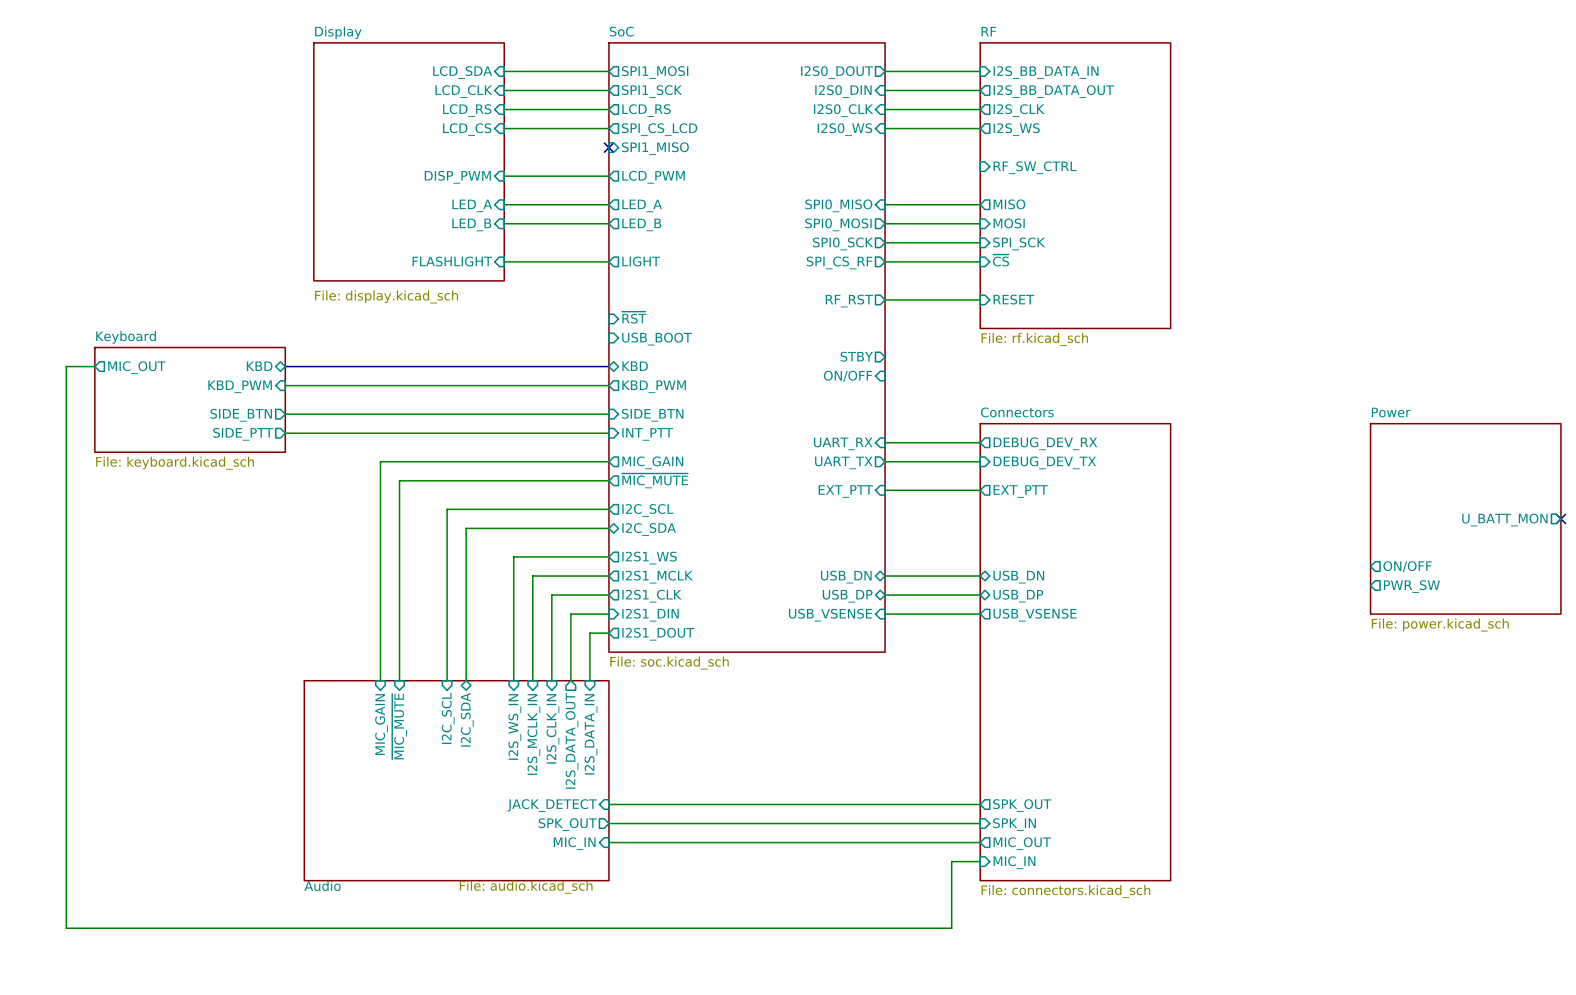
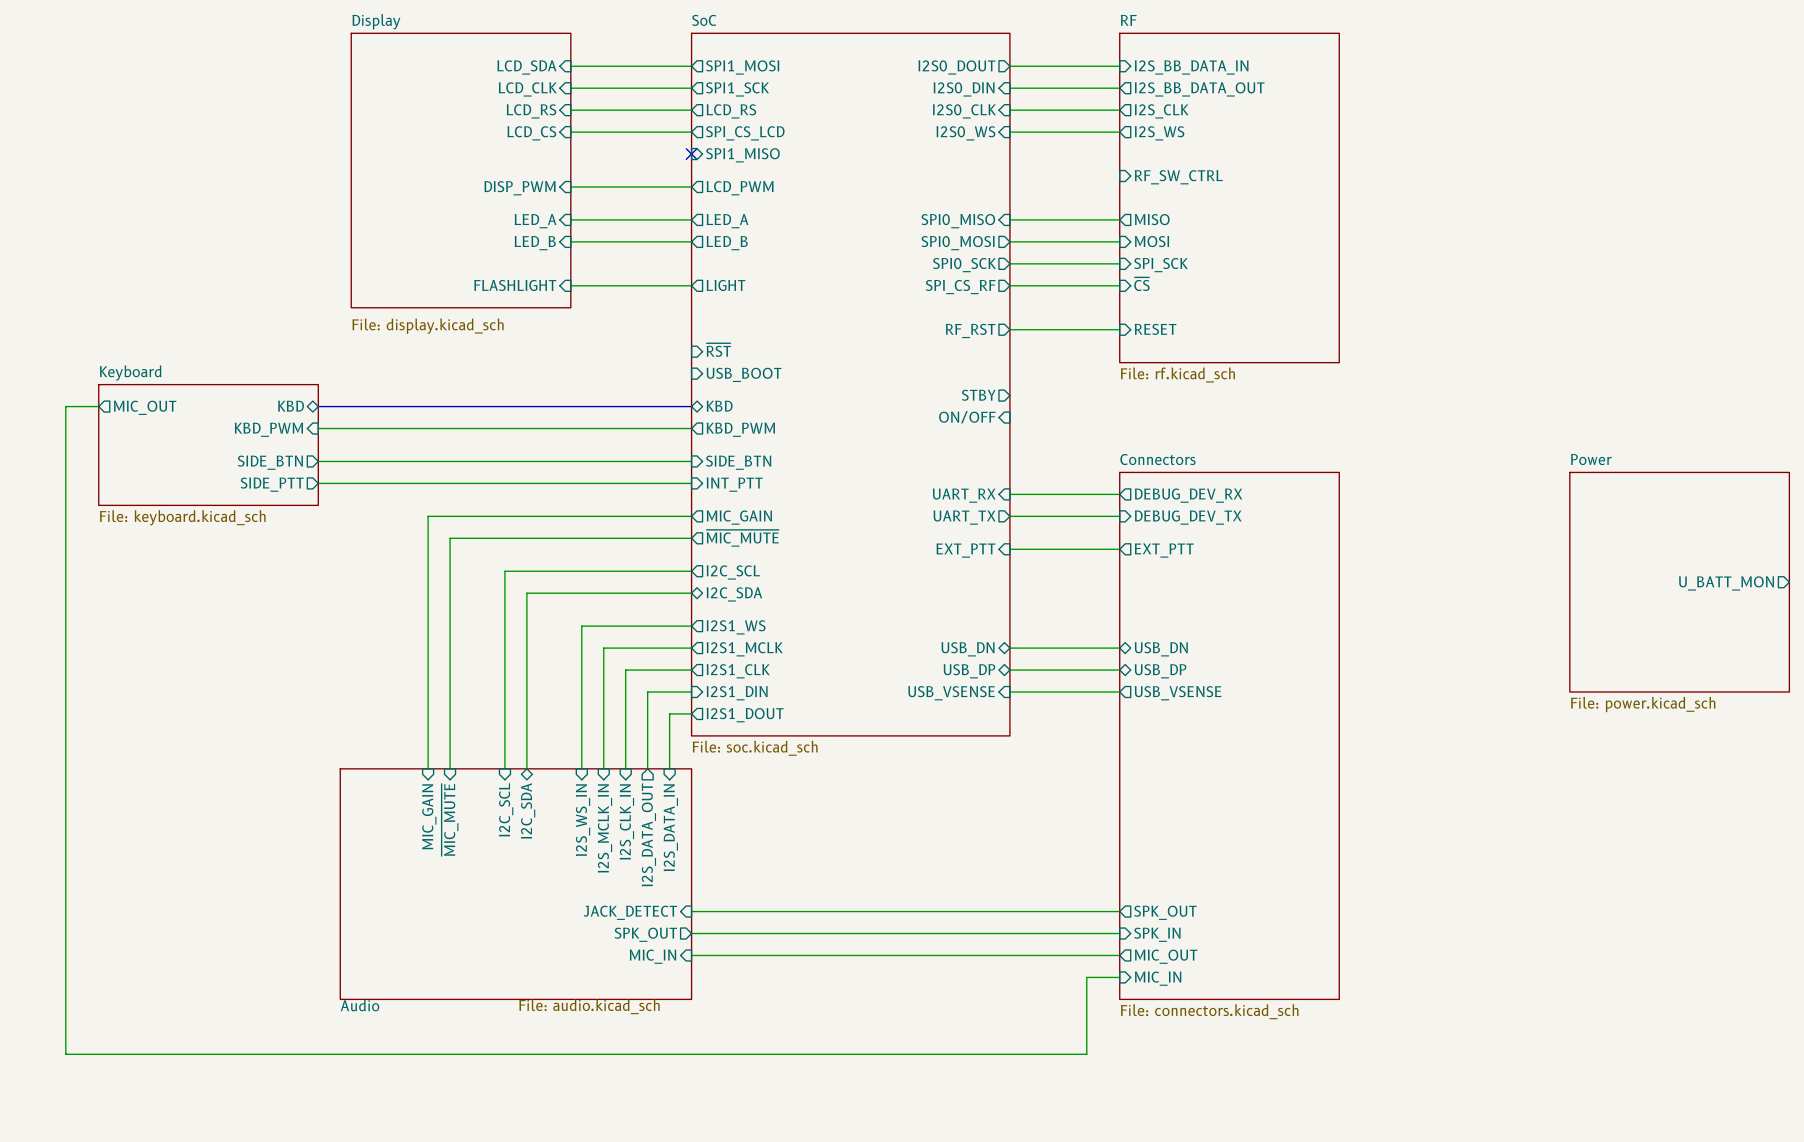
no-connect mark: (1560, 518) -> none
sheet pin: ON/OFF (1407, 566) -> none
sheet pin: PWR_SW (1411, 586) -> none

